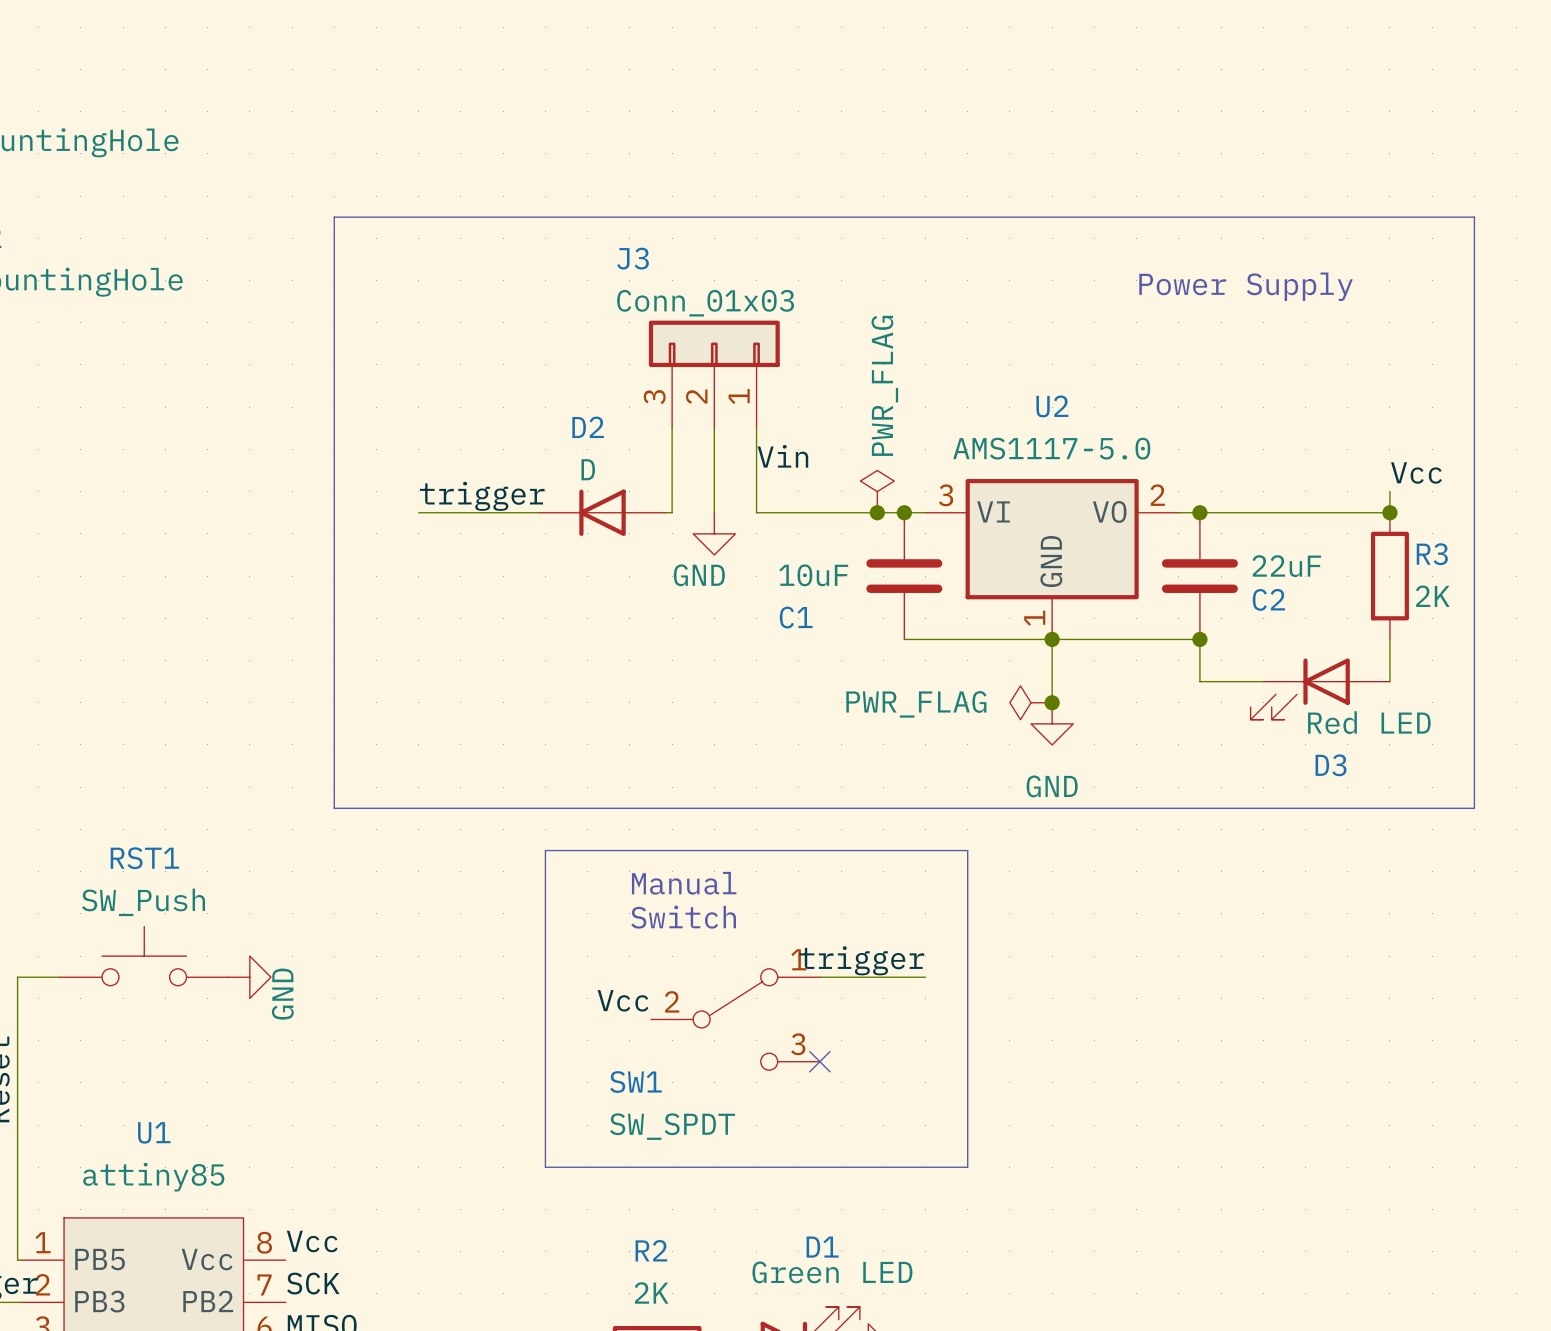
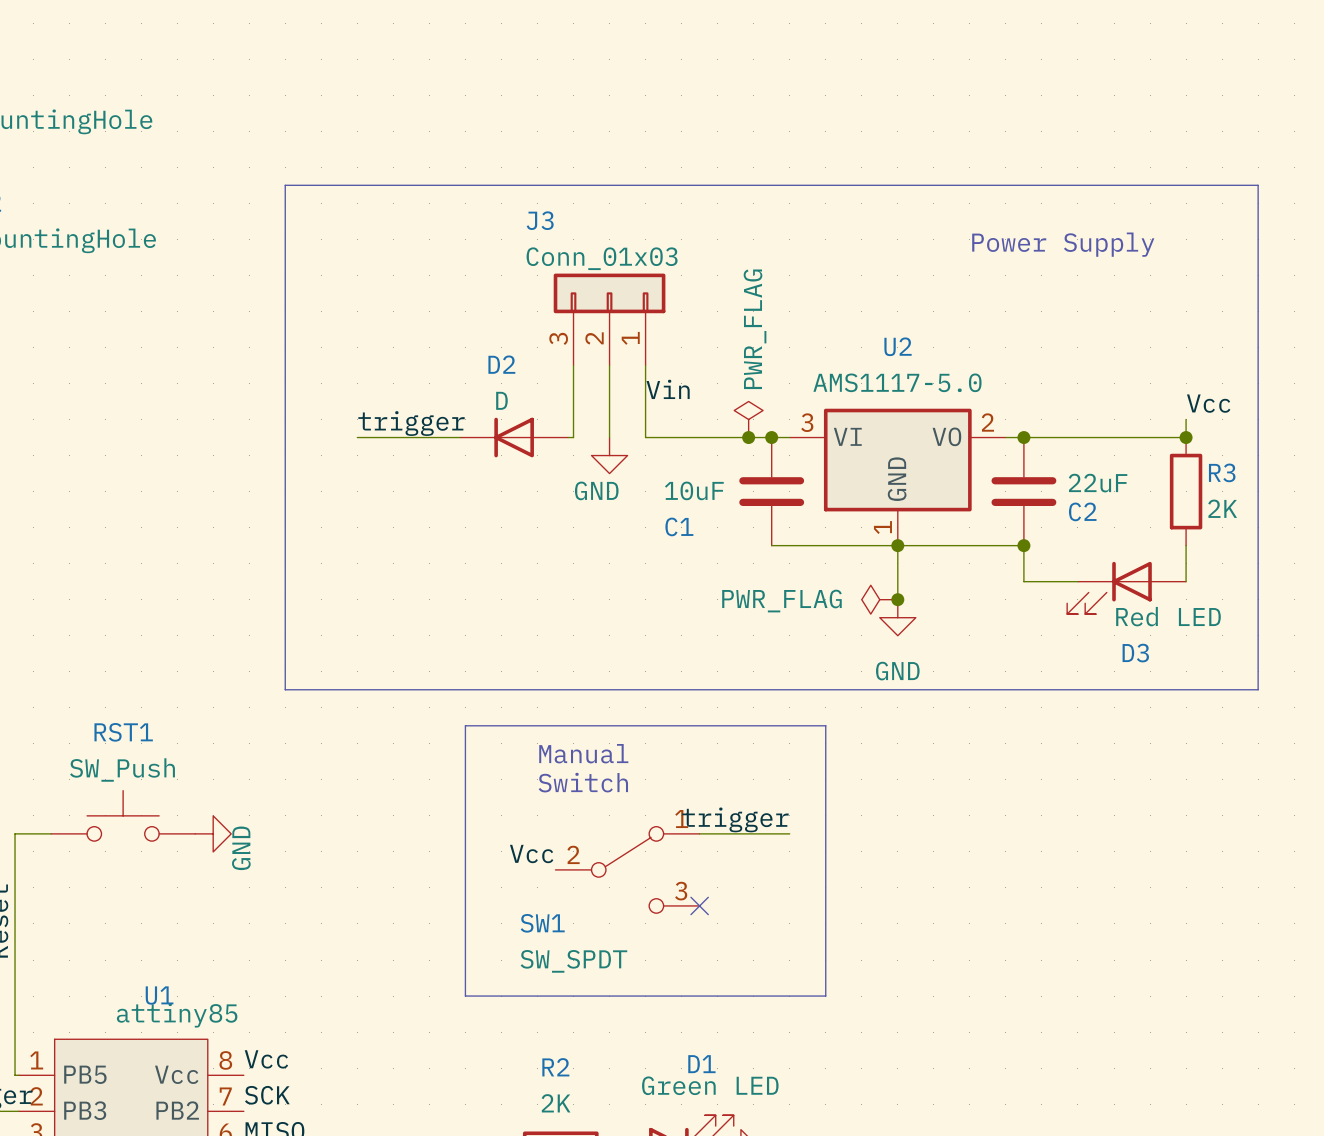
U1 name position: U1 (154, 1132) -> U1 (159, 995)
U1 value position: attiny85 (153, 1177) -> attiny85 (177, 1015)

